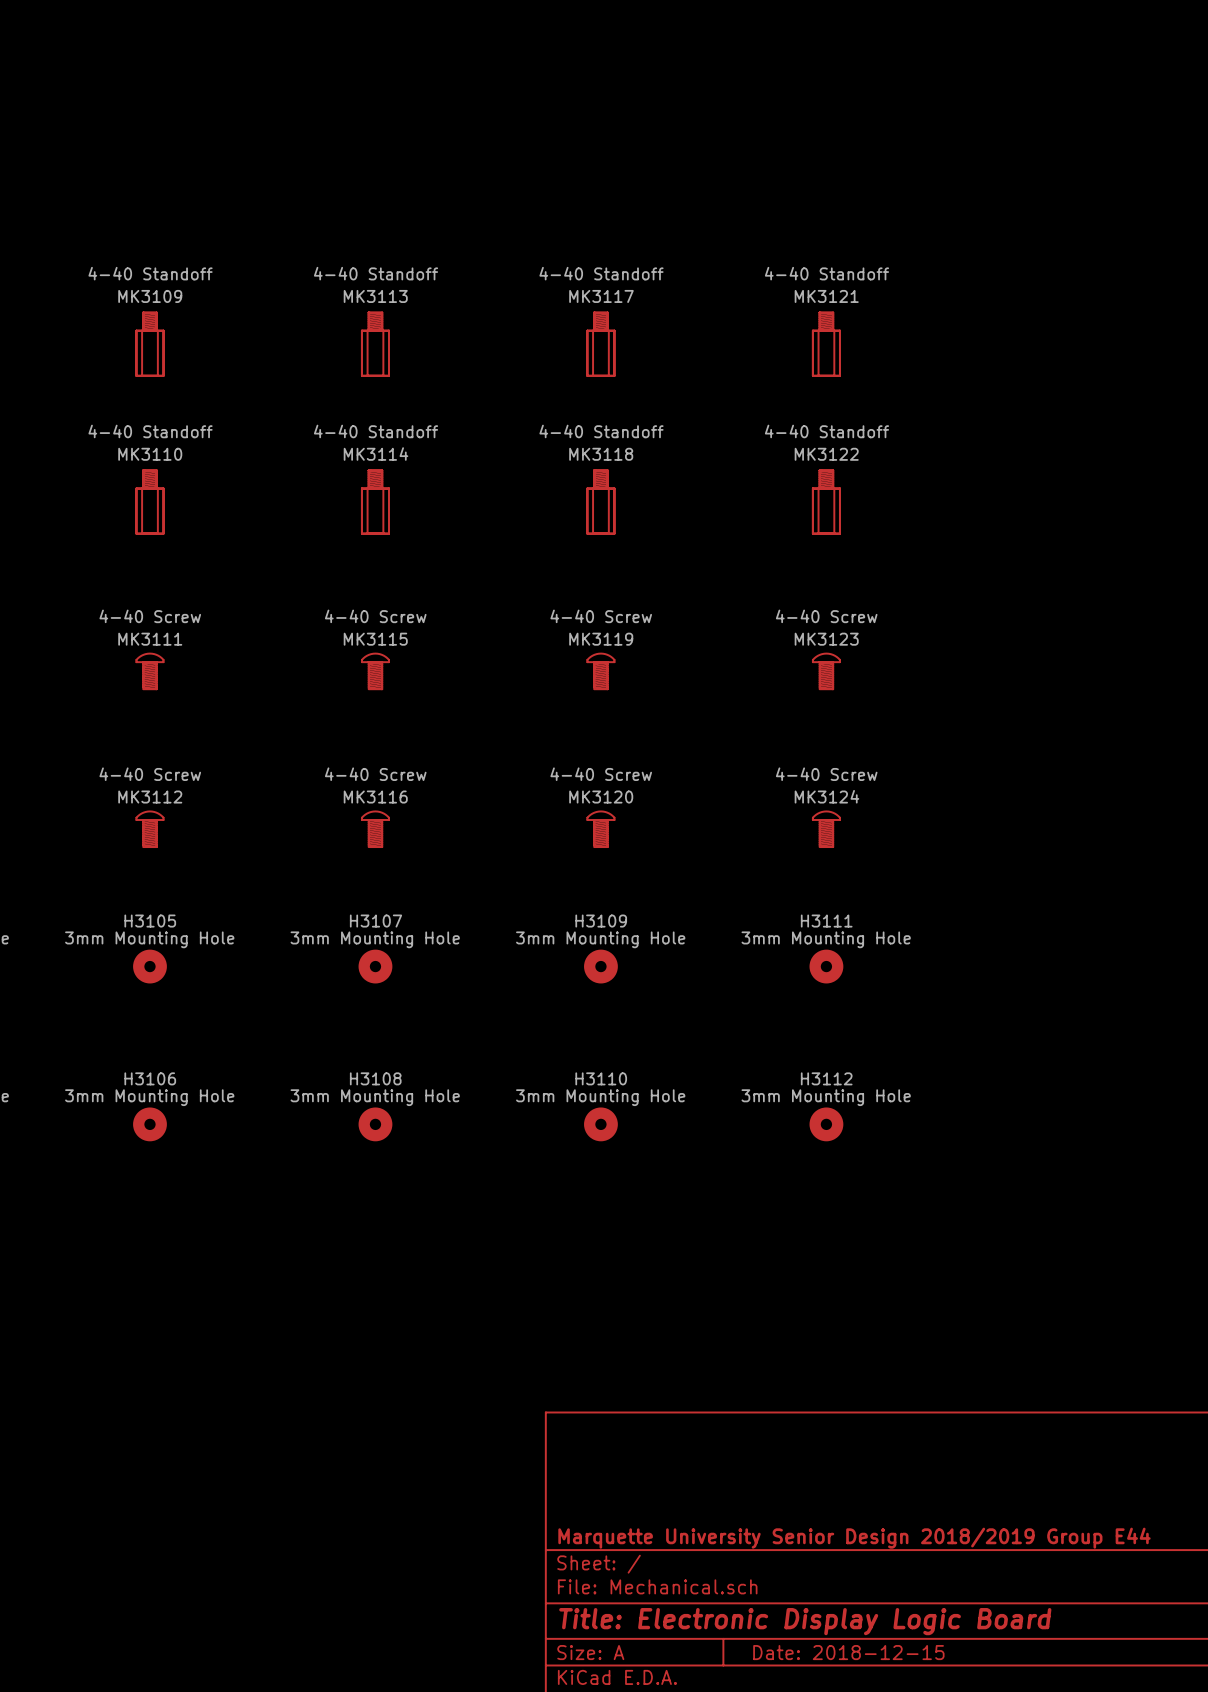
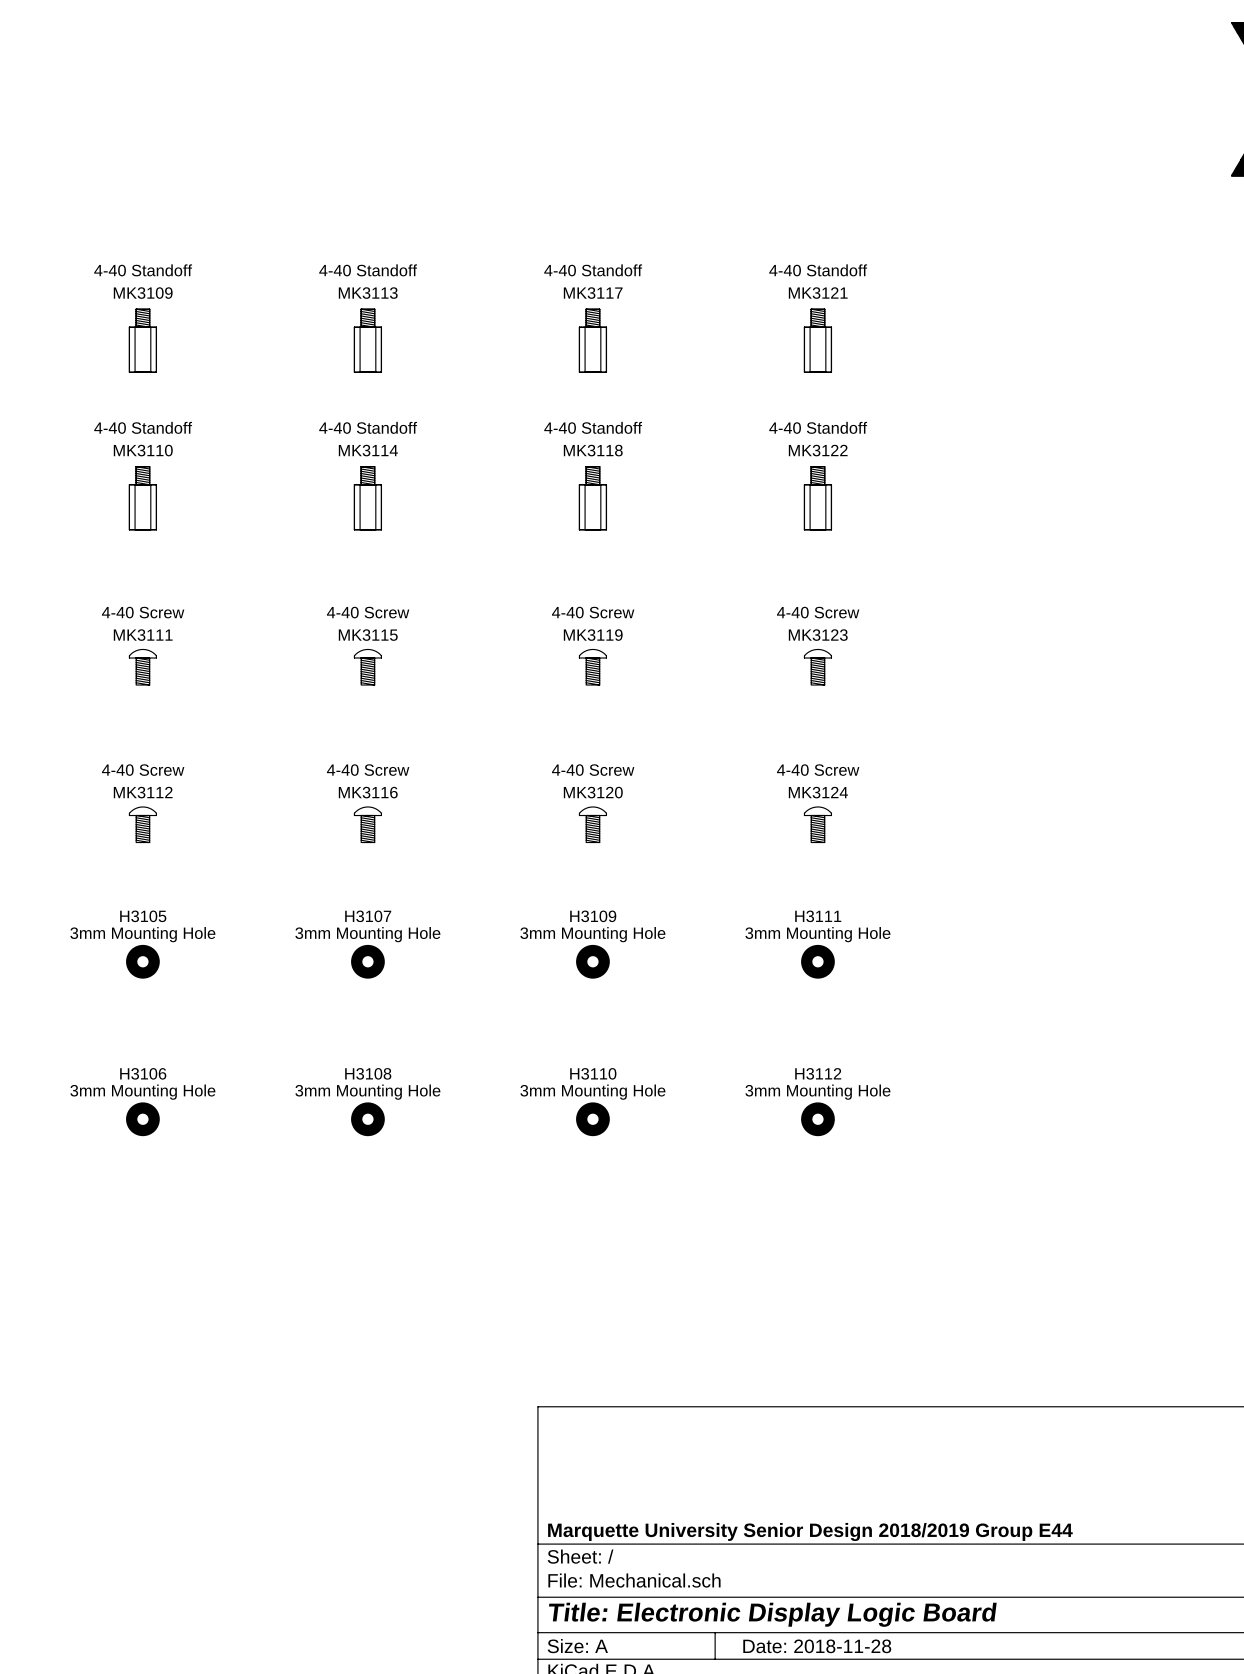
title block: Date: 2018-12-15 (848, 1652) -> Date: 2018-11-28 (817, 1646)

